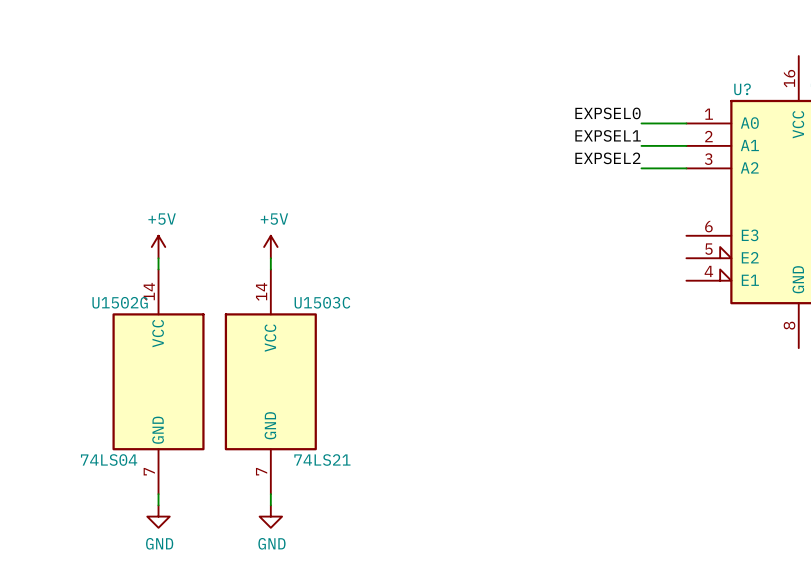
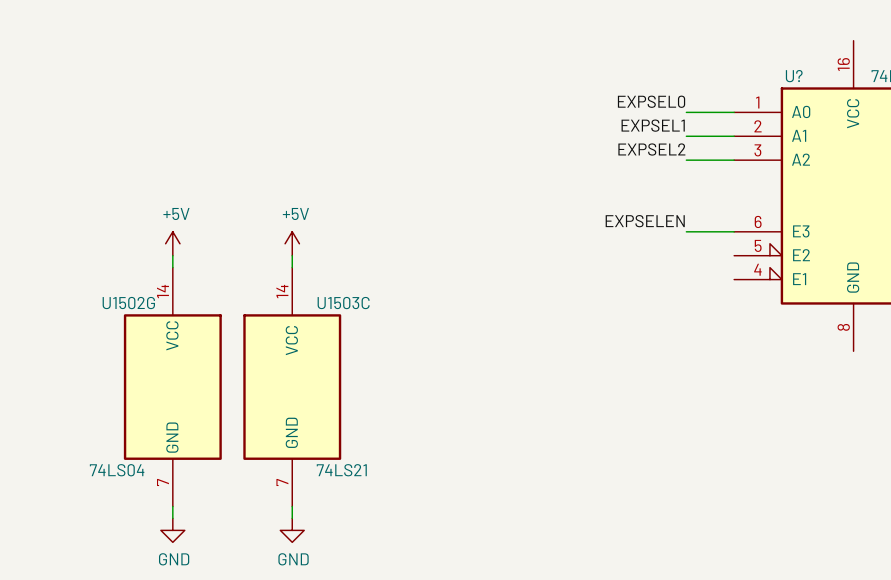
label: none -> EXPSELEN (645, 221)
wire: none -> (686, 231) (734, 231)

